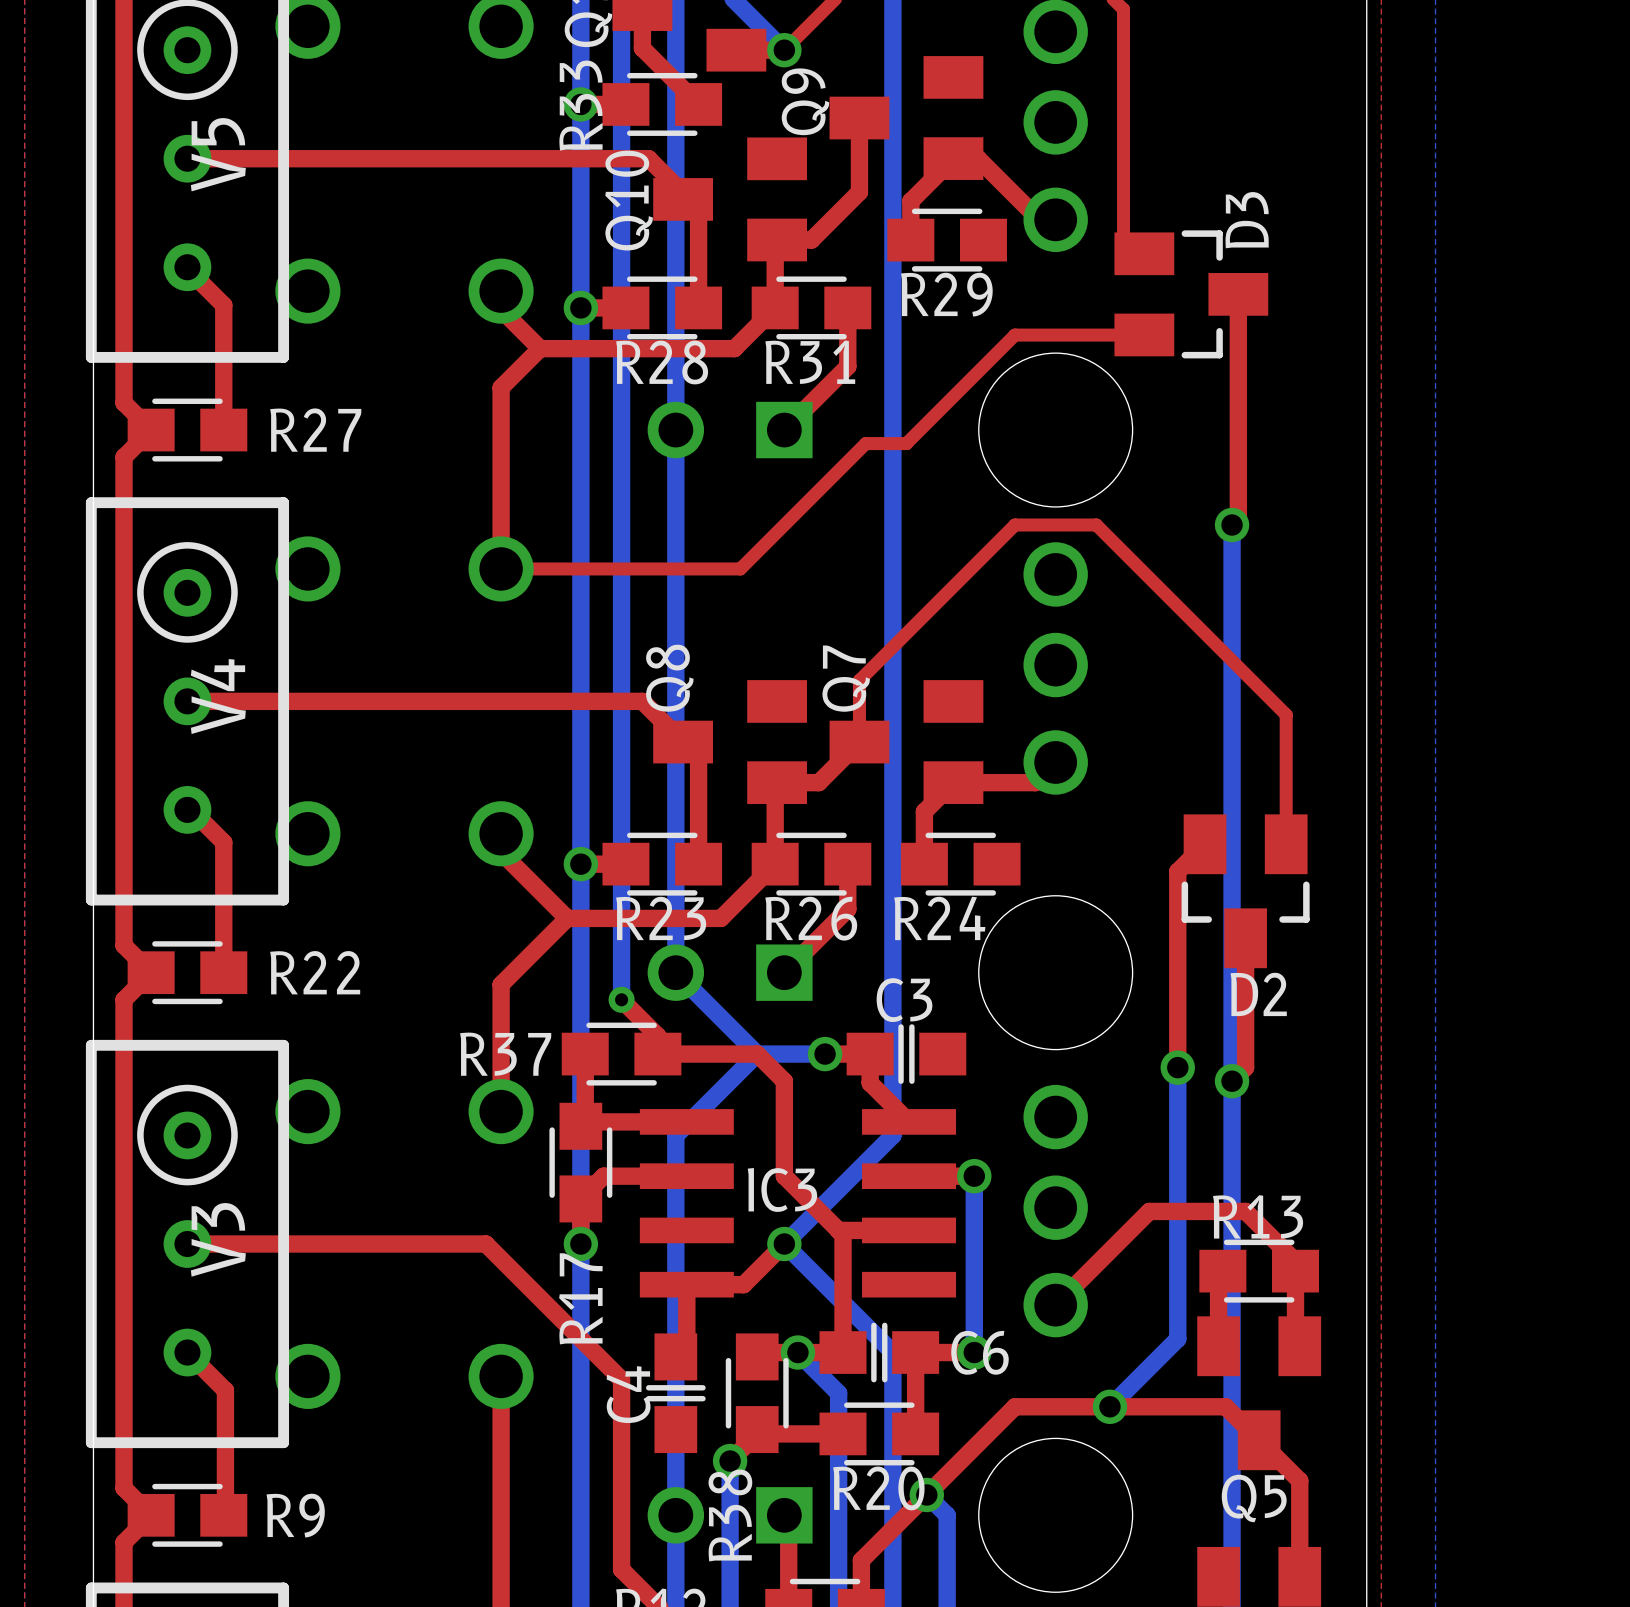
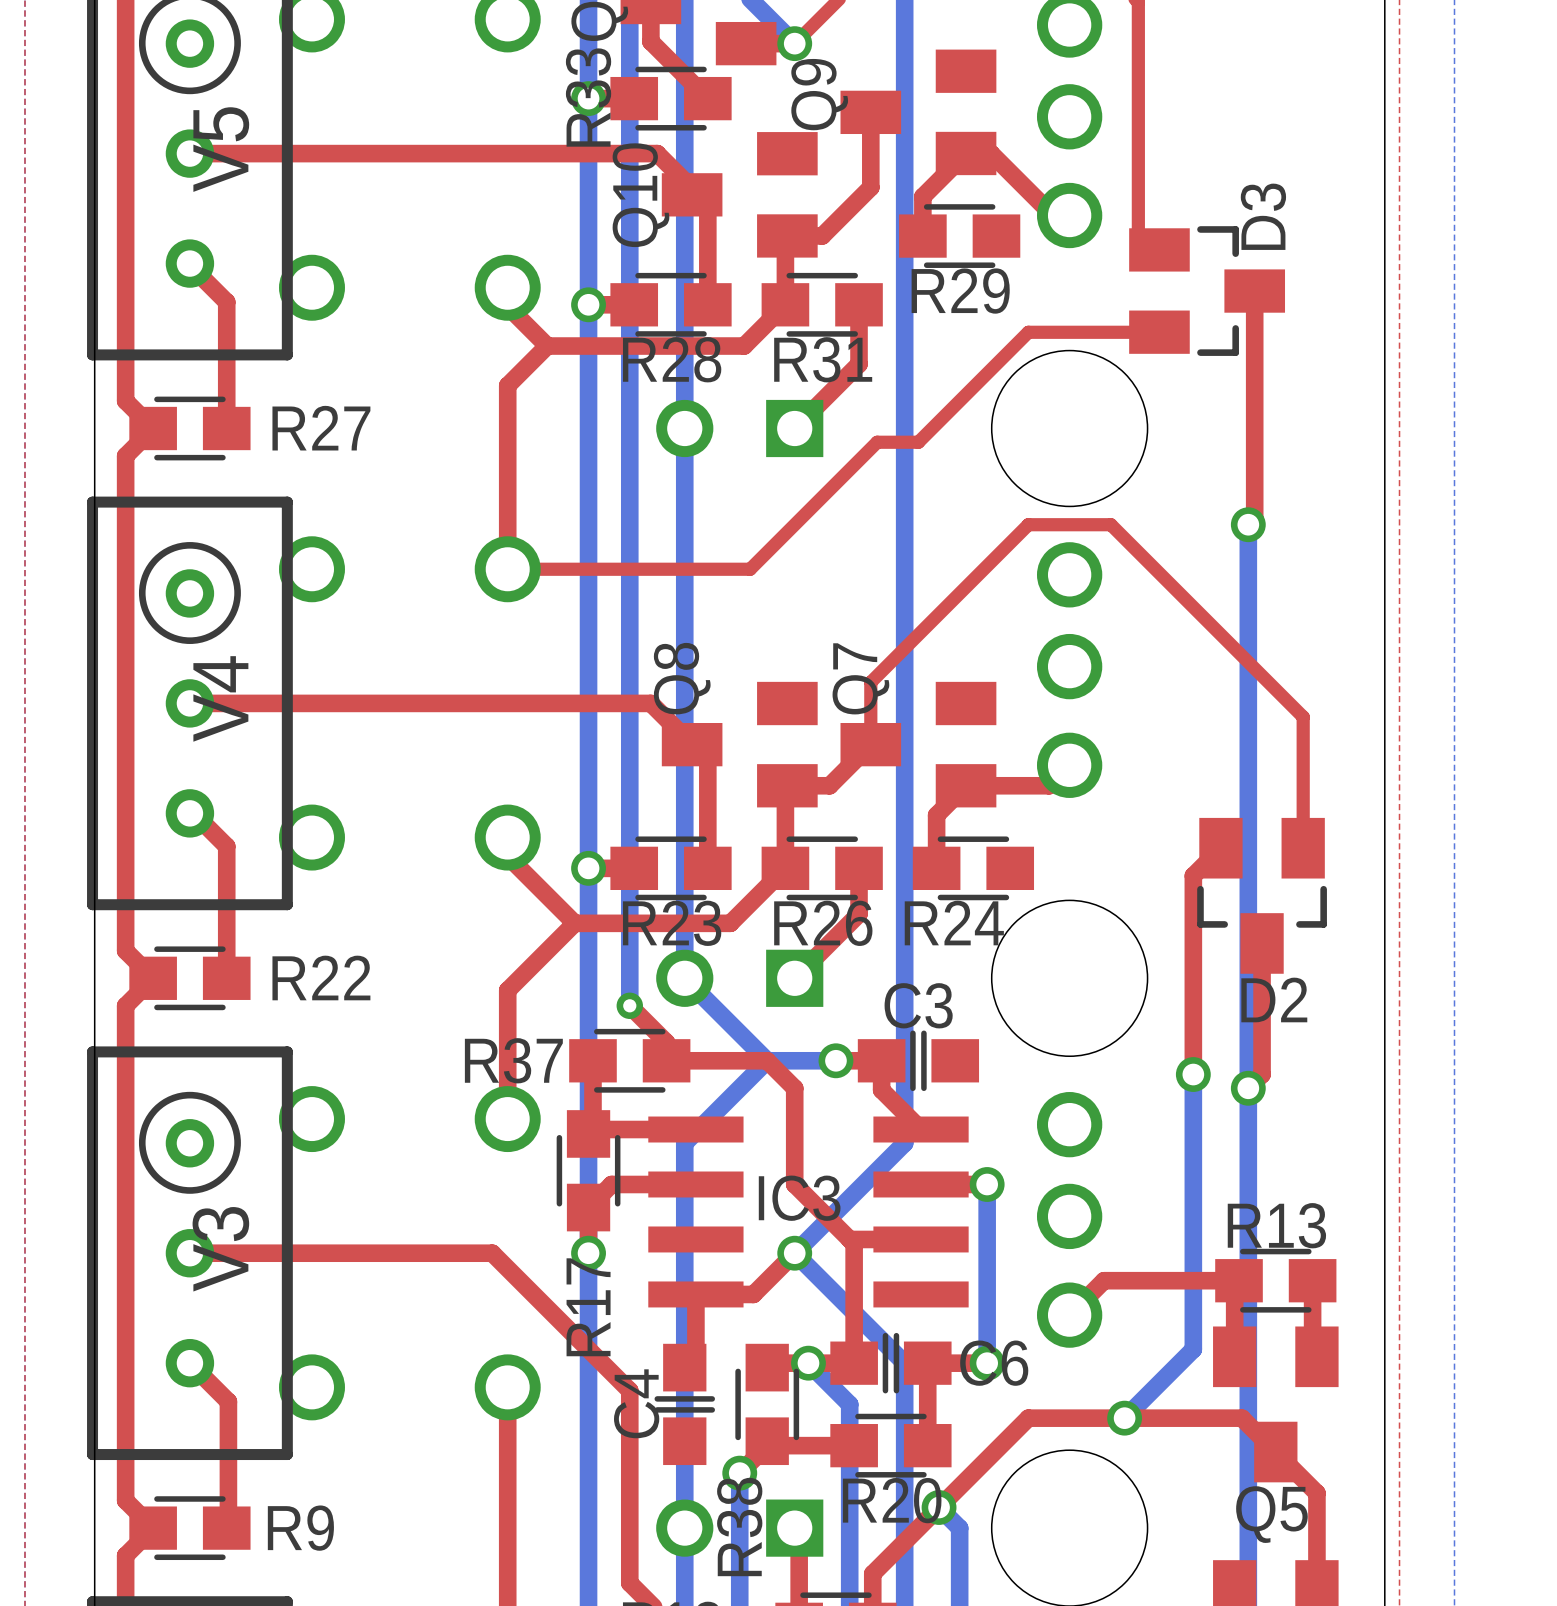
top track: (1089, 1271) (1149, 1211) (1245, 1211) (1295, 1261) (1295, 1271) -> (1104, 1280) (1239, 1280)

